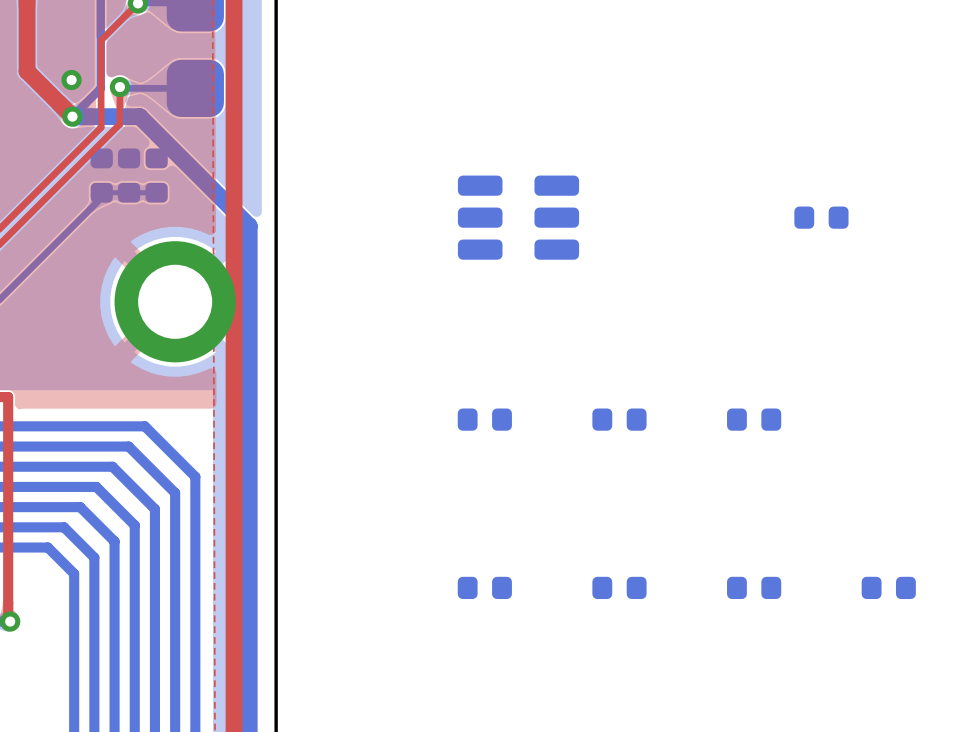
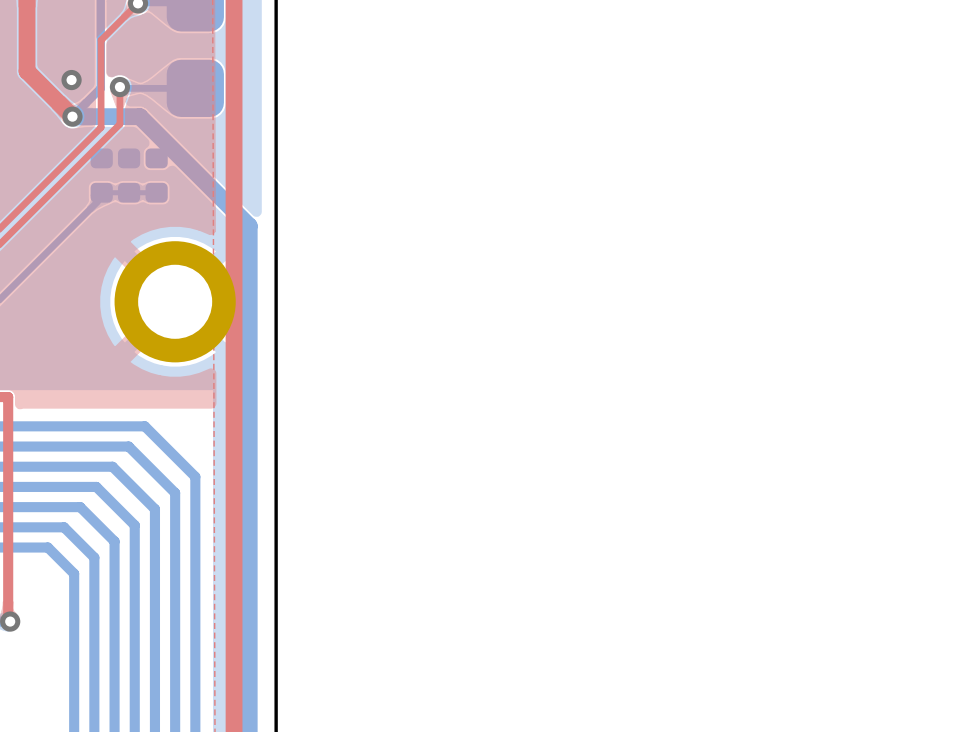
part: (518, 217) -> none
part: (821, 217) -> none
part: (484, 419) -> none
part: (619, 419) -> none
part: (754, 419) -> none
part: (484, 587) -> none
part: (619, 587) -> none
part: (754, 587) -> none
part: (888, 587) -> none

